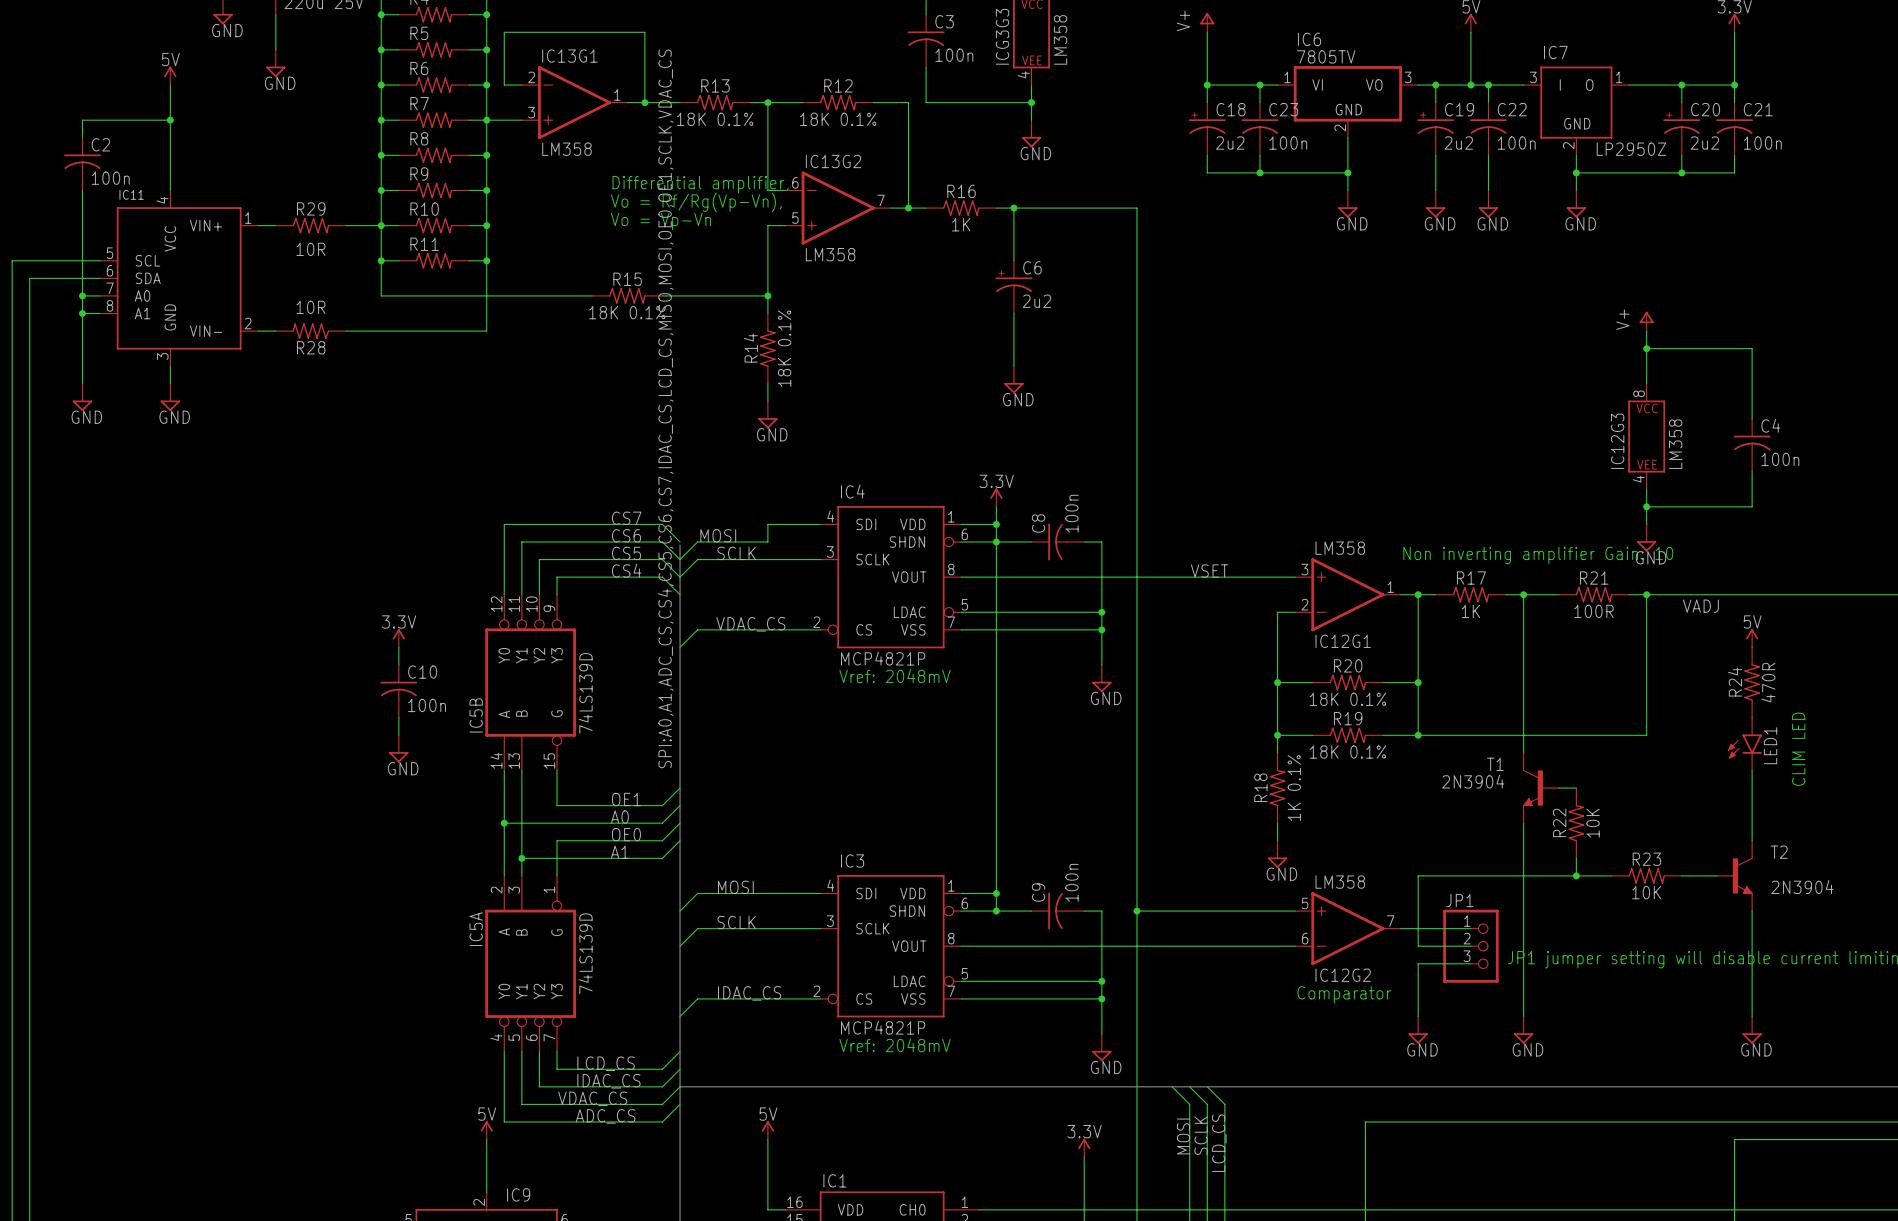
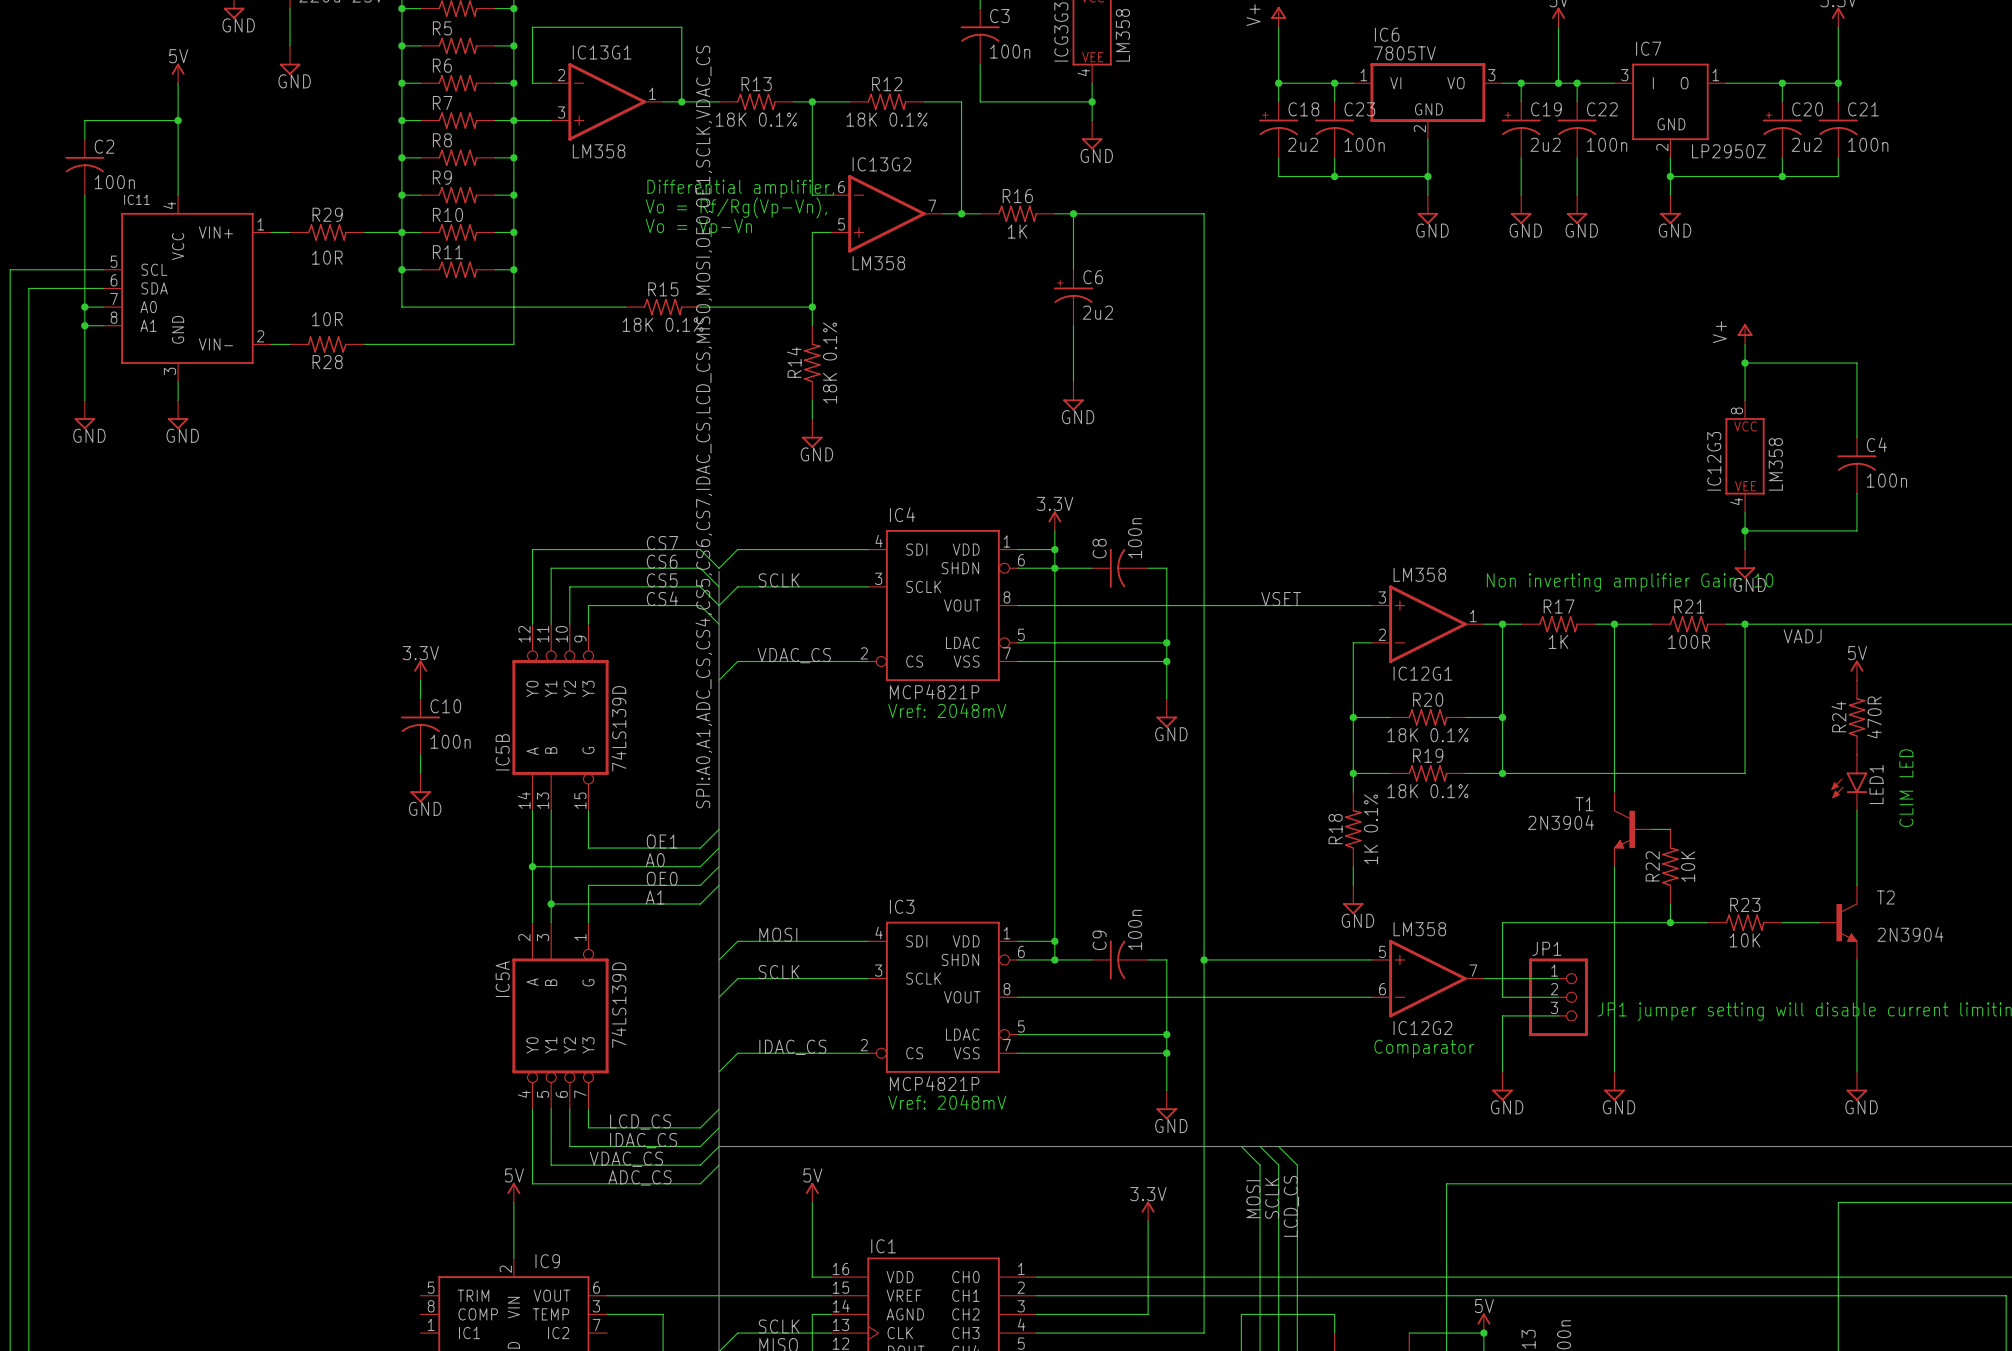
wire: (767, 524) (767, 541) (697, 541) (680, 559) -> (812, 549) (737, 549) (719, 568)
label: MOSI (718, 535) -> none

